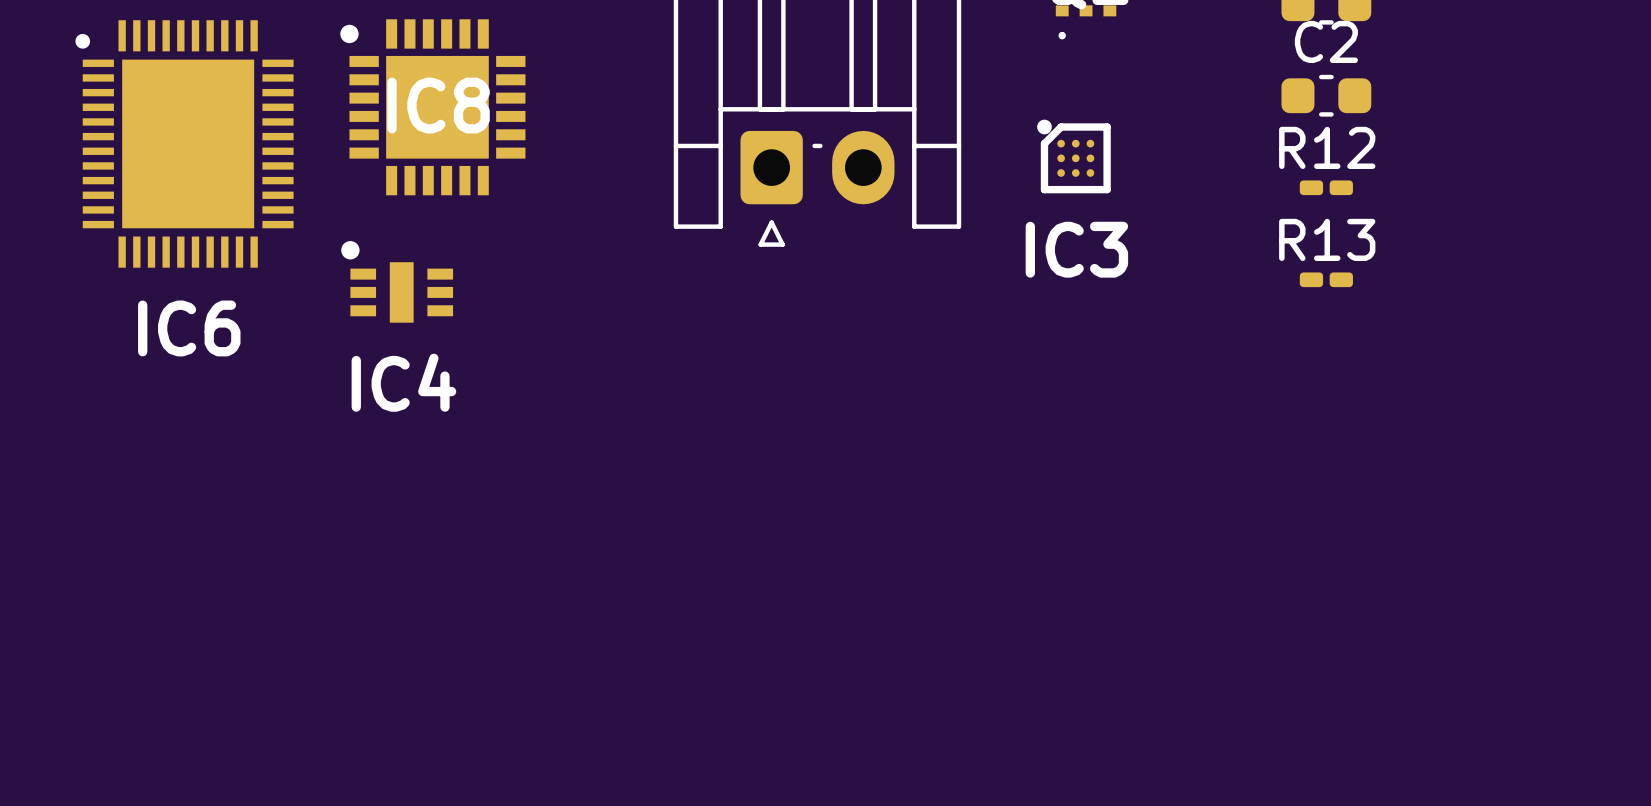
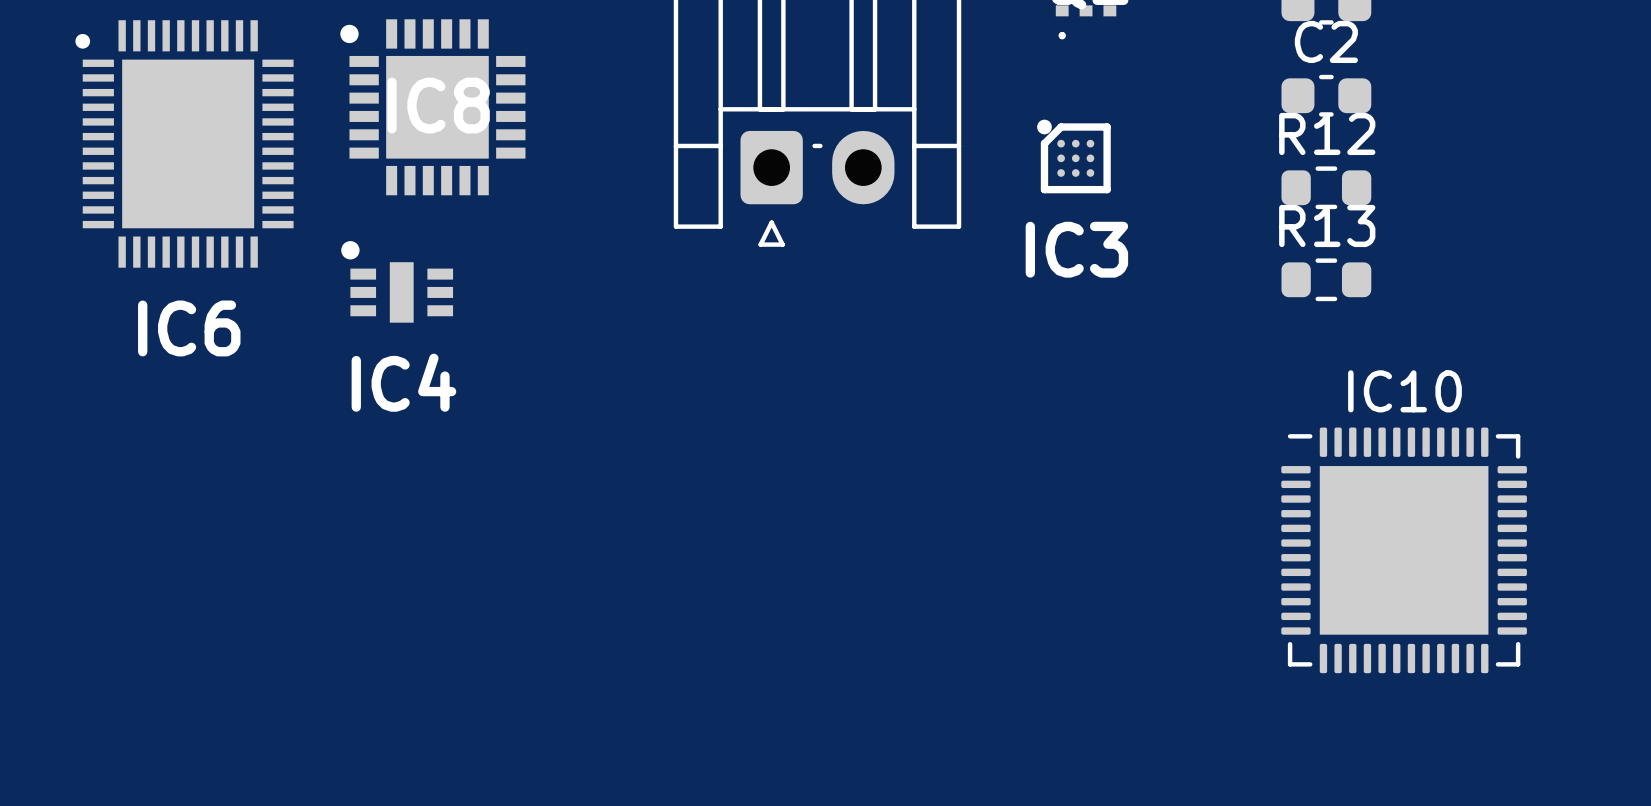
R12 footprint: [1299, 180, 1353, 196] -> [1281, 166, 1372, 210]
R13 footprint: [1299, 272, 1353, 288] -> [1281, 258, 1372, 302]
IC10: none -> (1404, 550)

